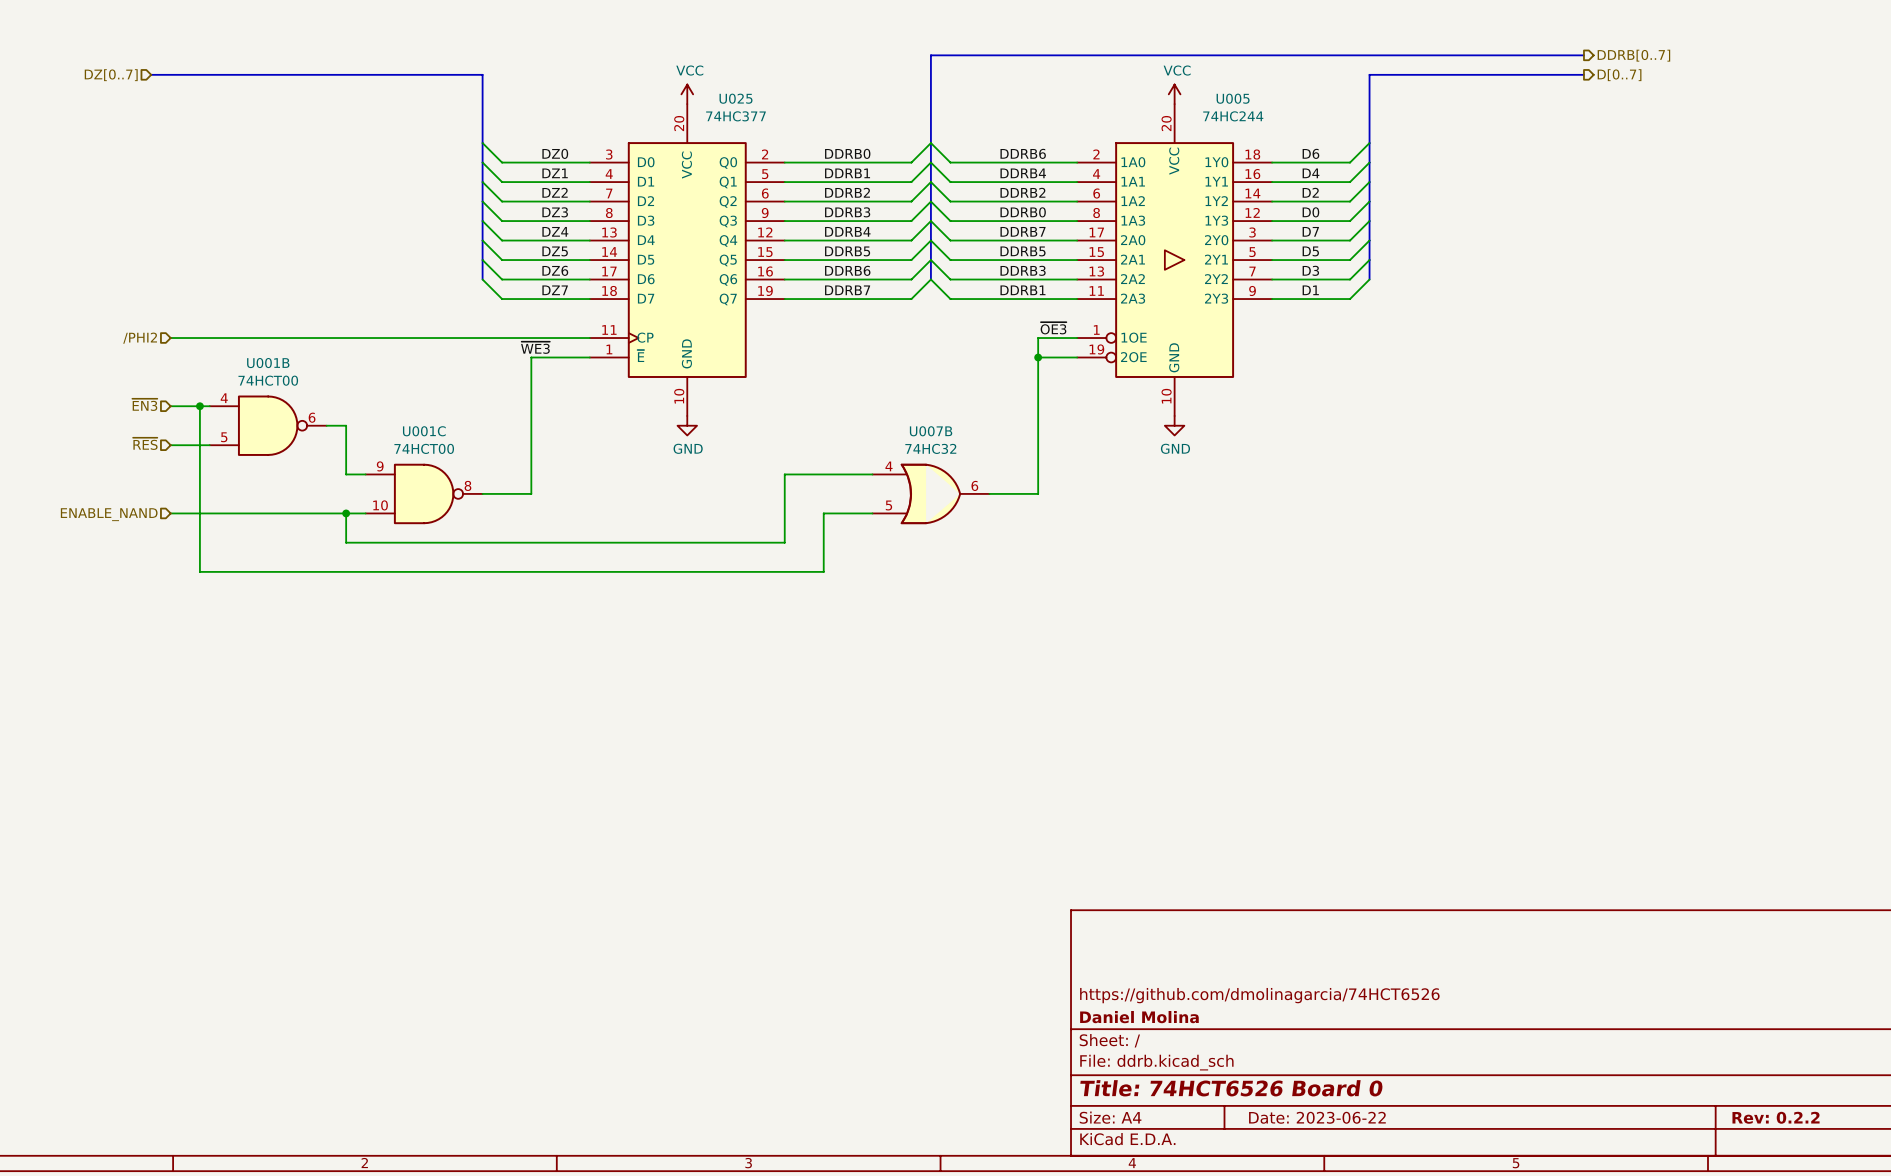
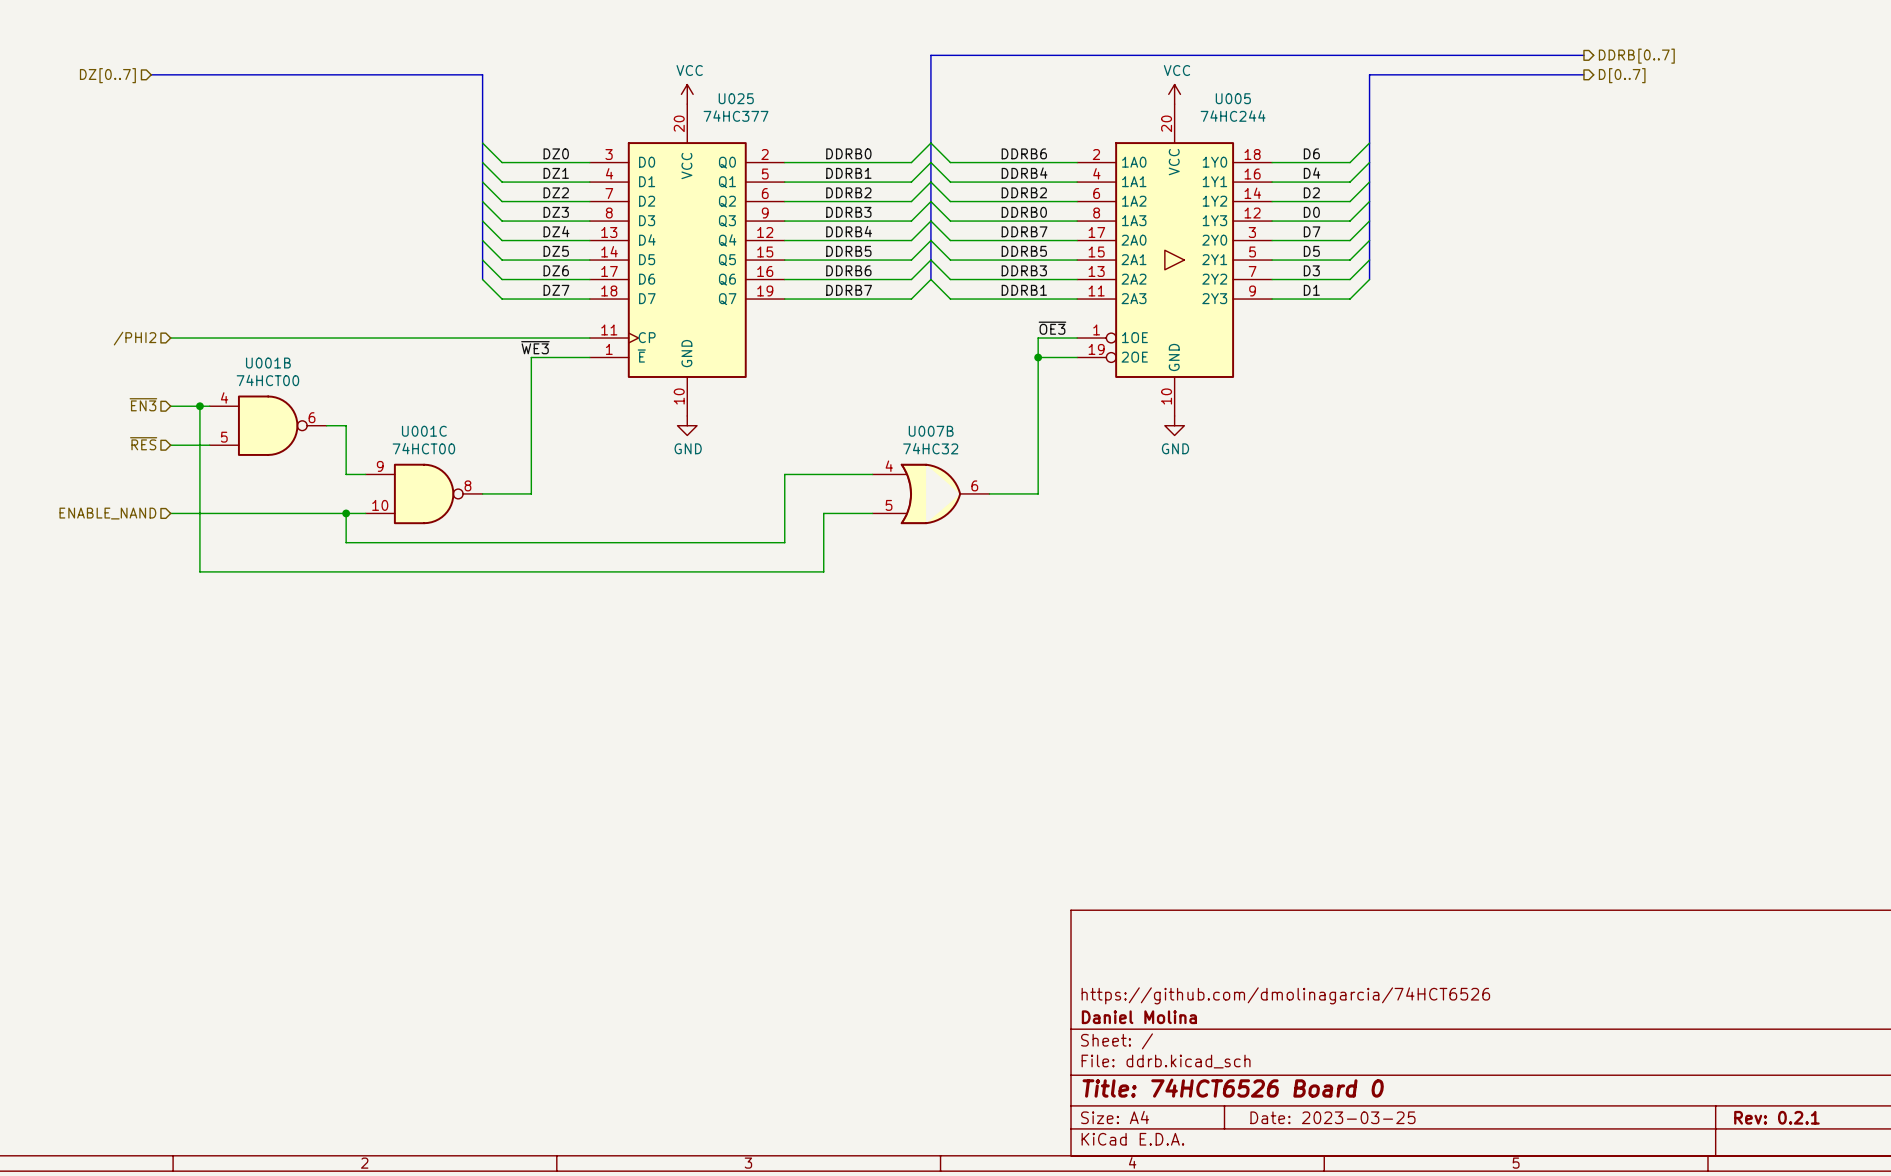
title block: Date: 2023-06-22 (1317, 1117) -> Date: 2023-03-25 (1332, 1117)
title block: Rev: 0.2.2 (1776, 1117) -> Rev: 0.2.1 (1776, 1117)

